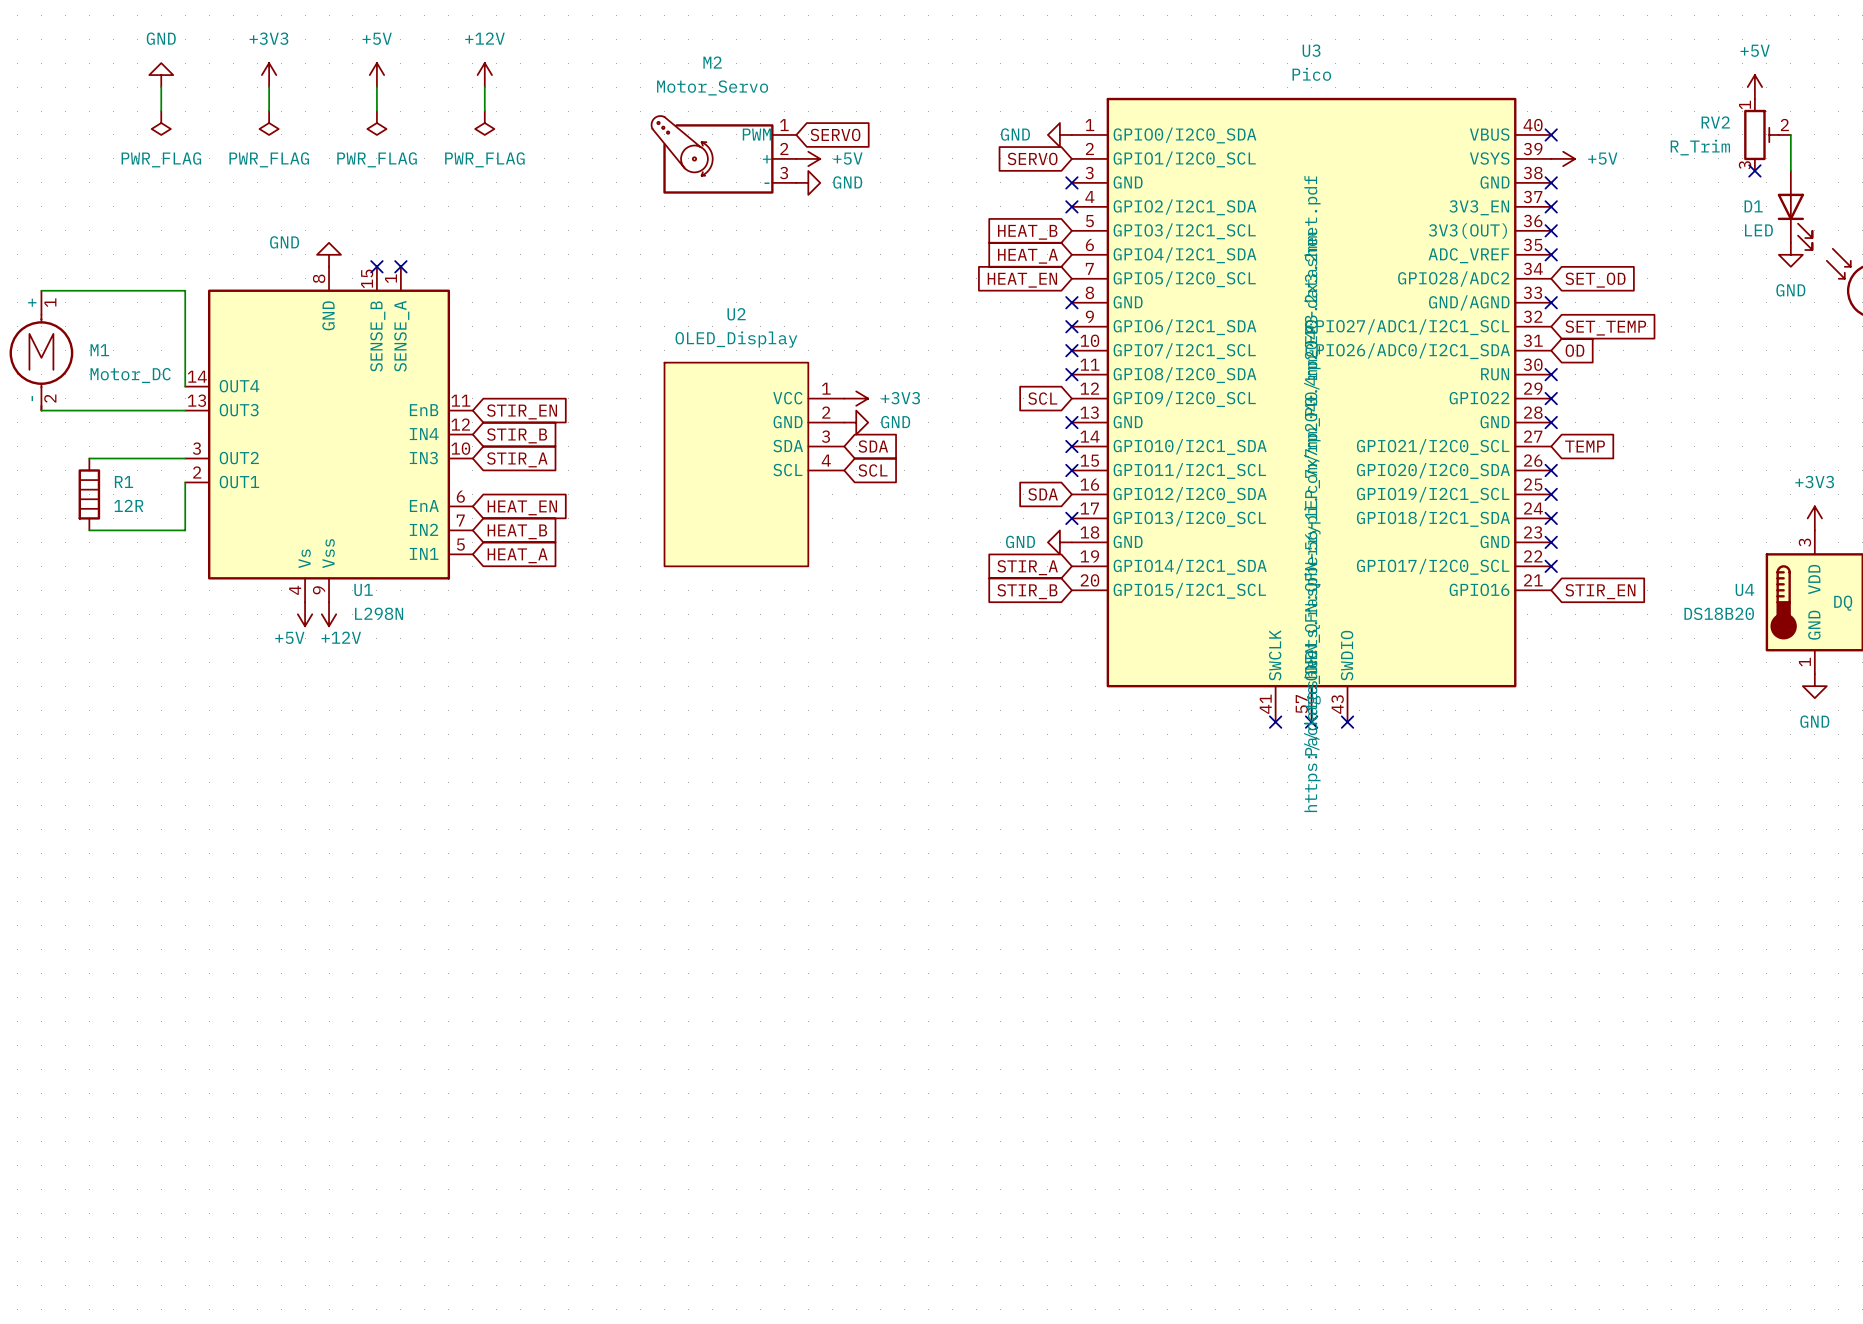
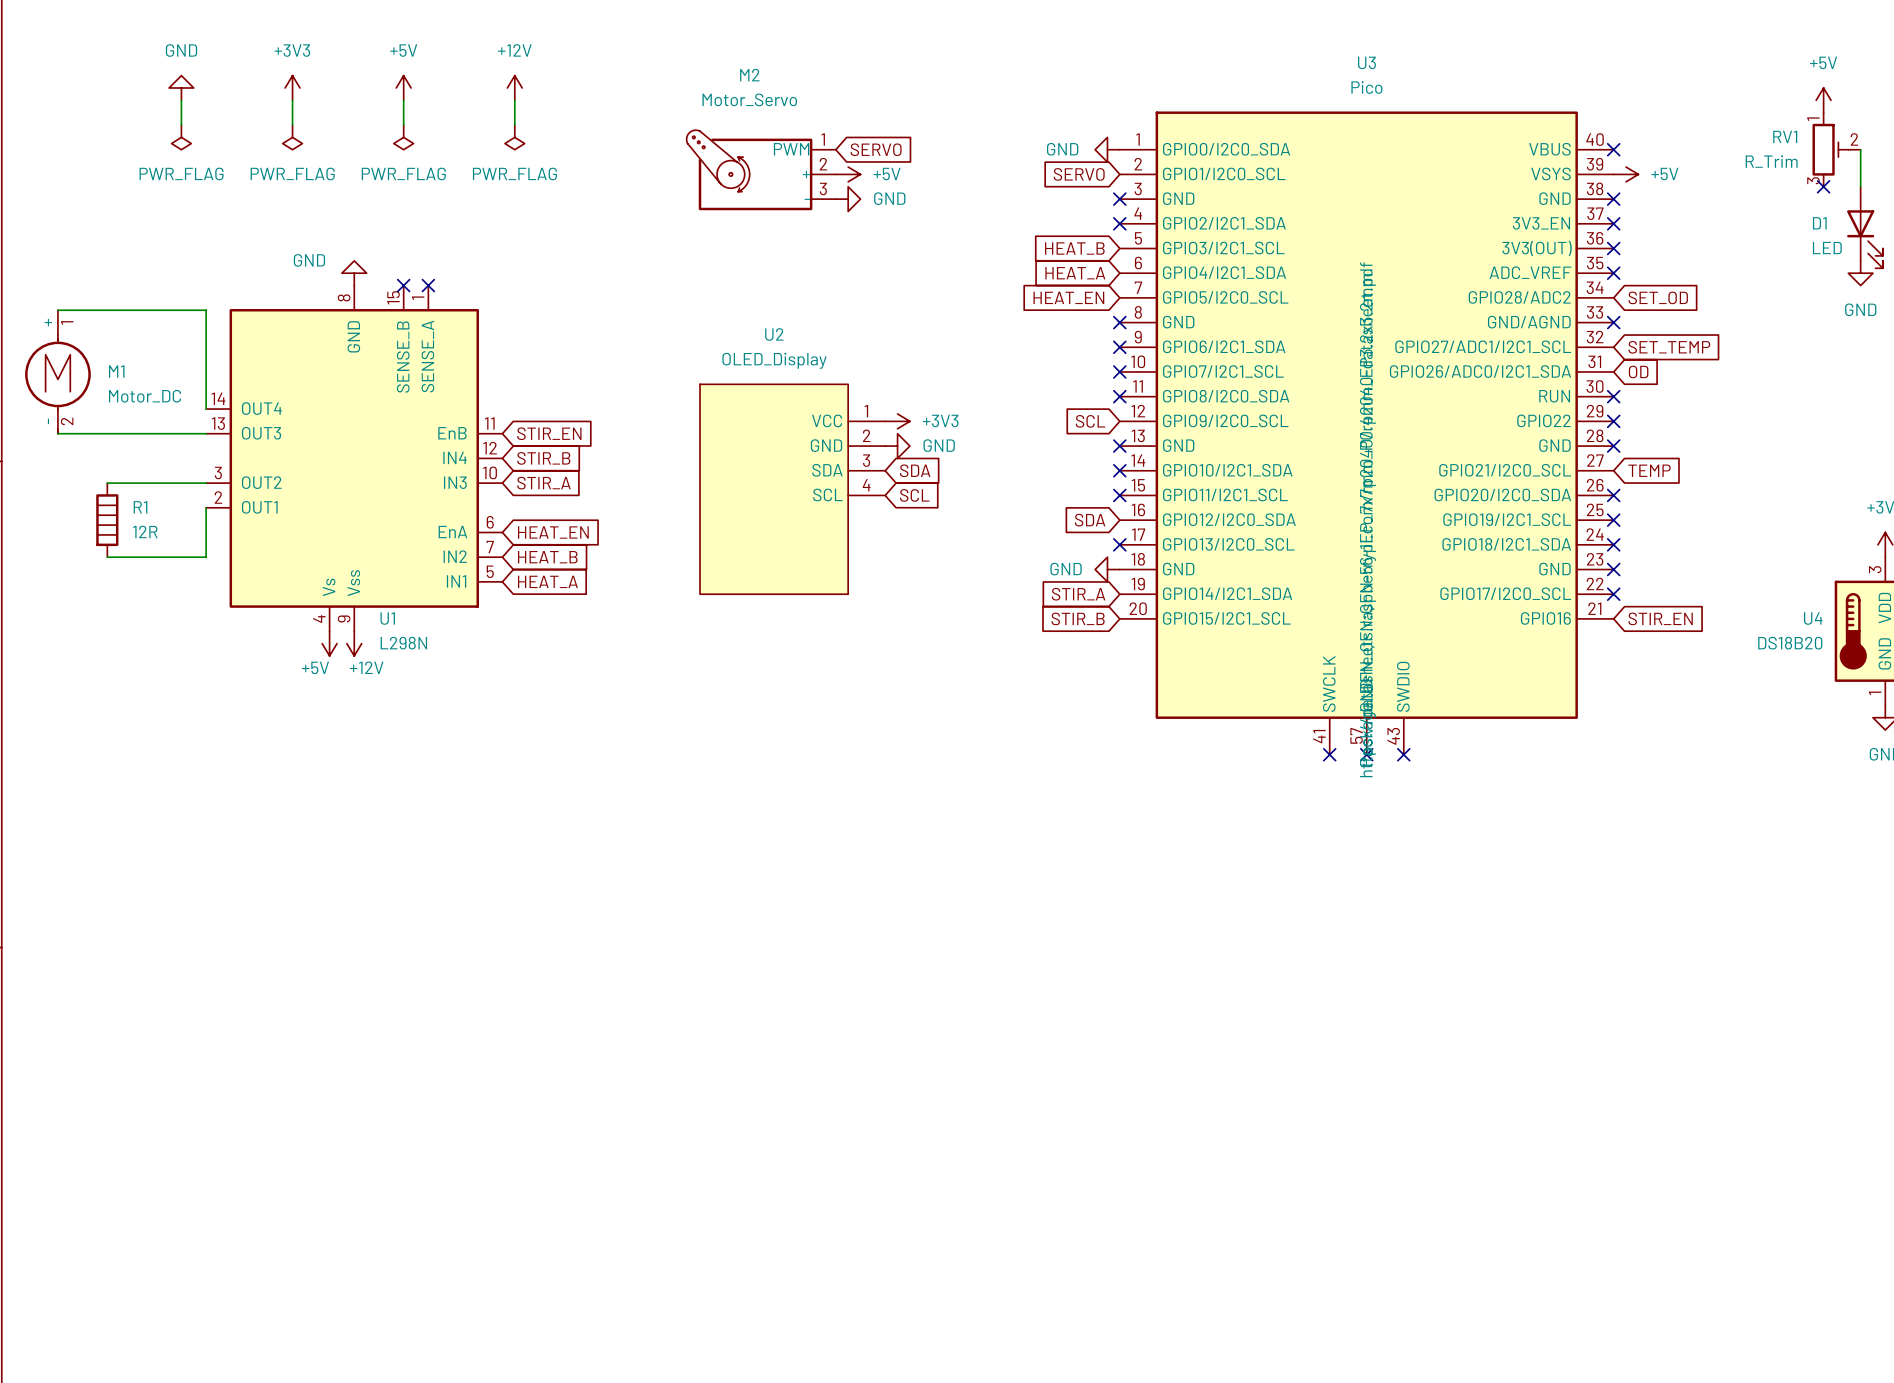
RV2 name: RV2 (1715, 122) -> RV1 (1785, 136)

